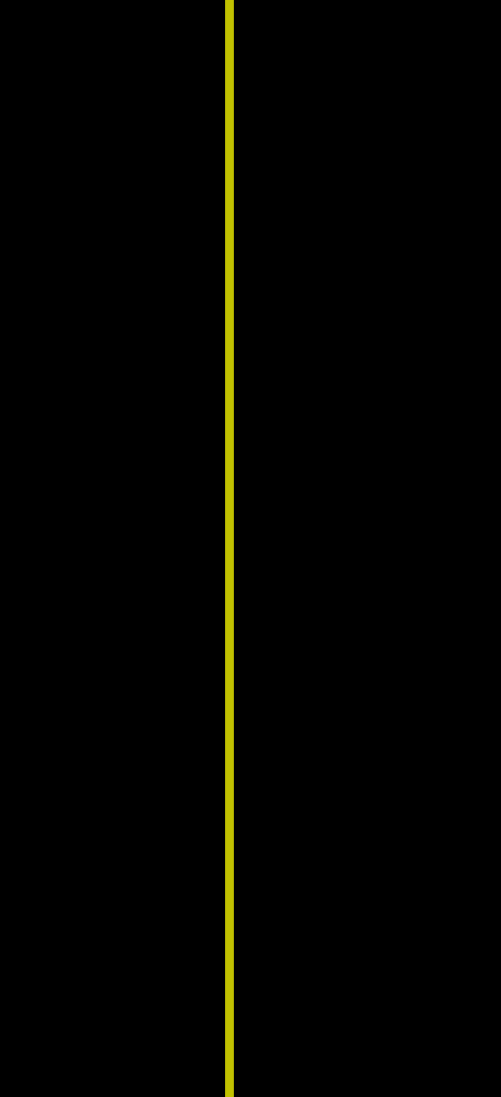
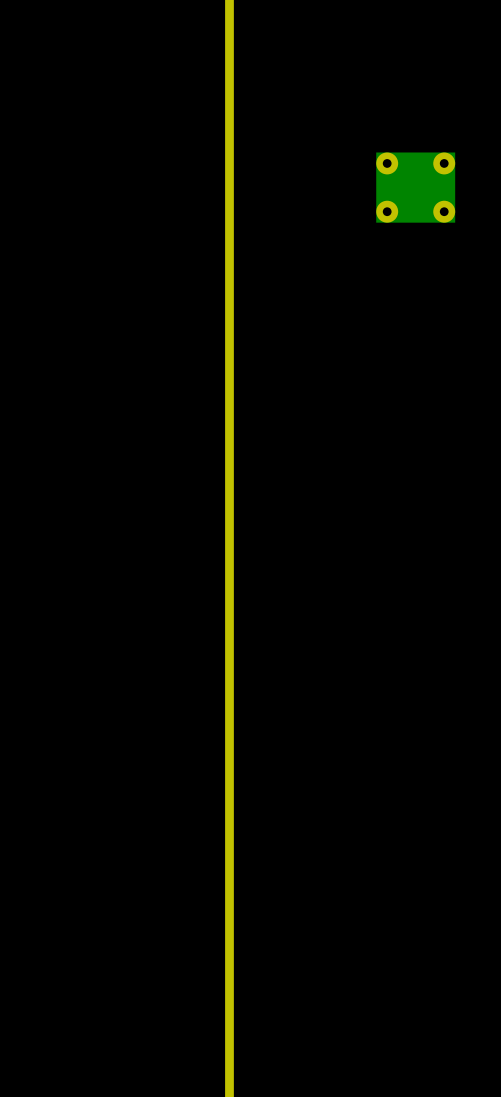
part: none -> (415, 187)

